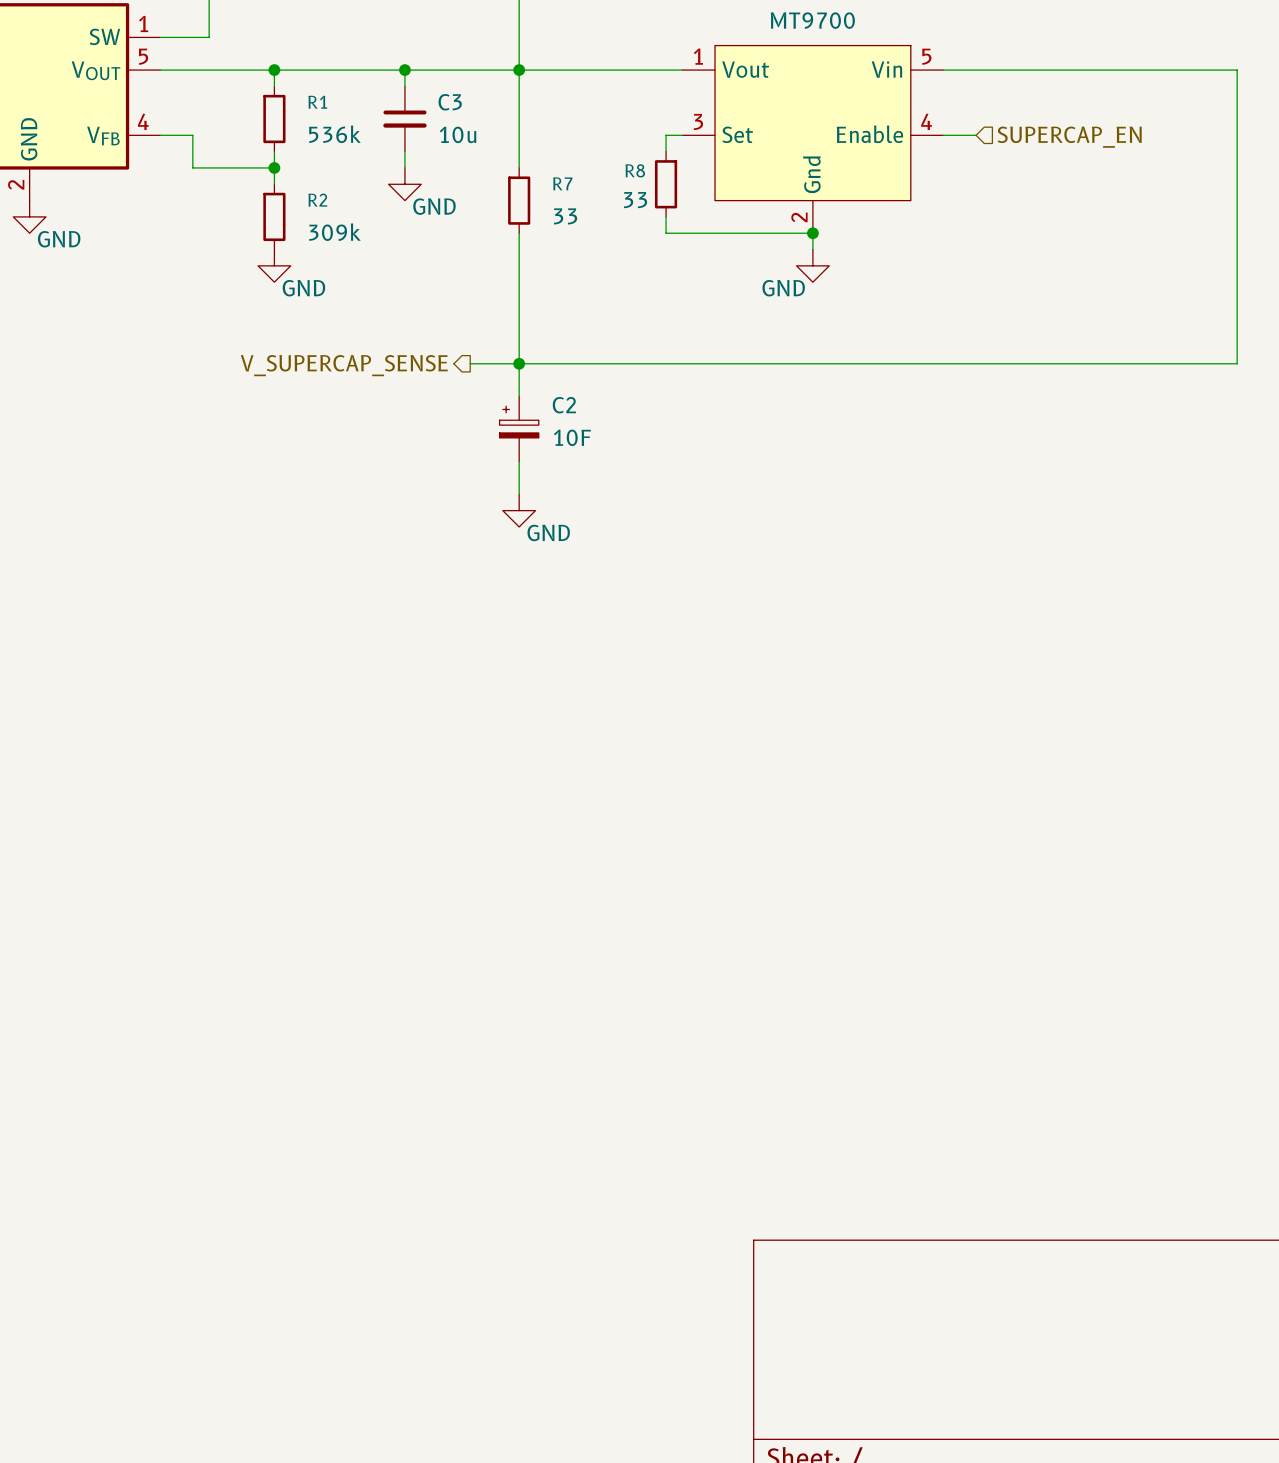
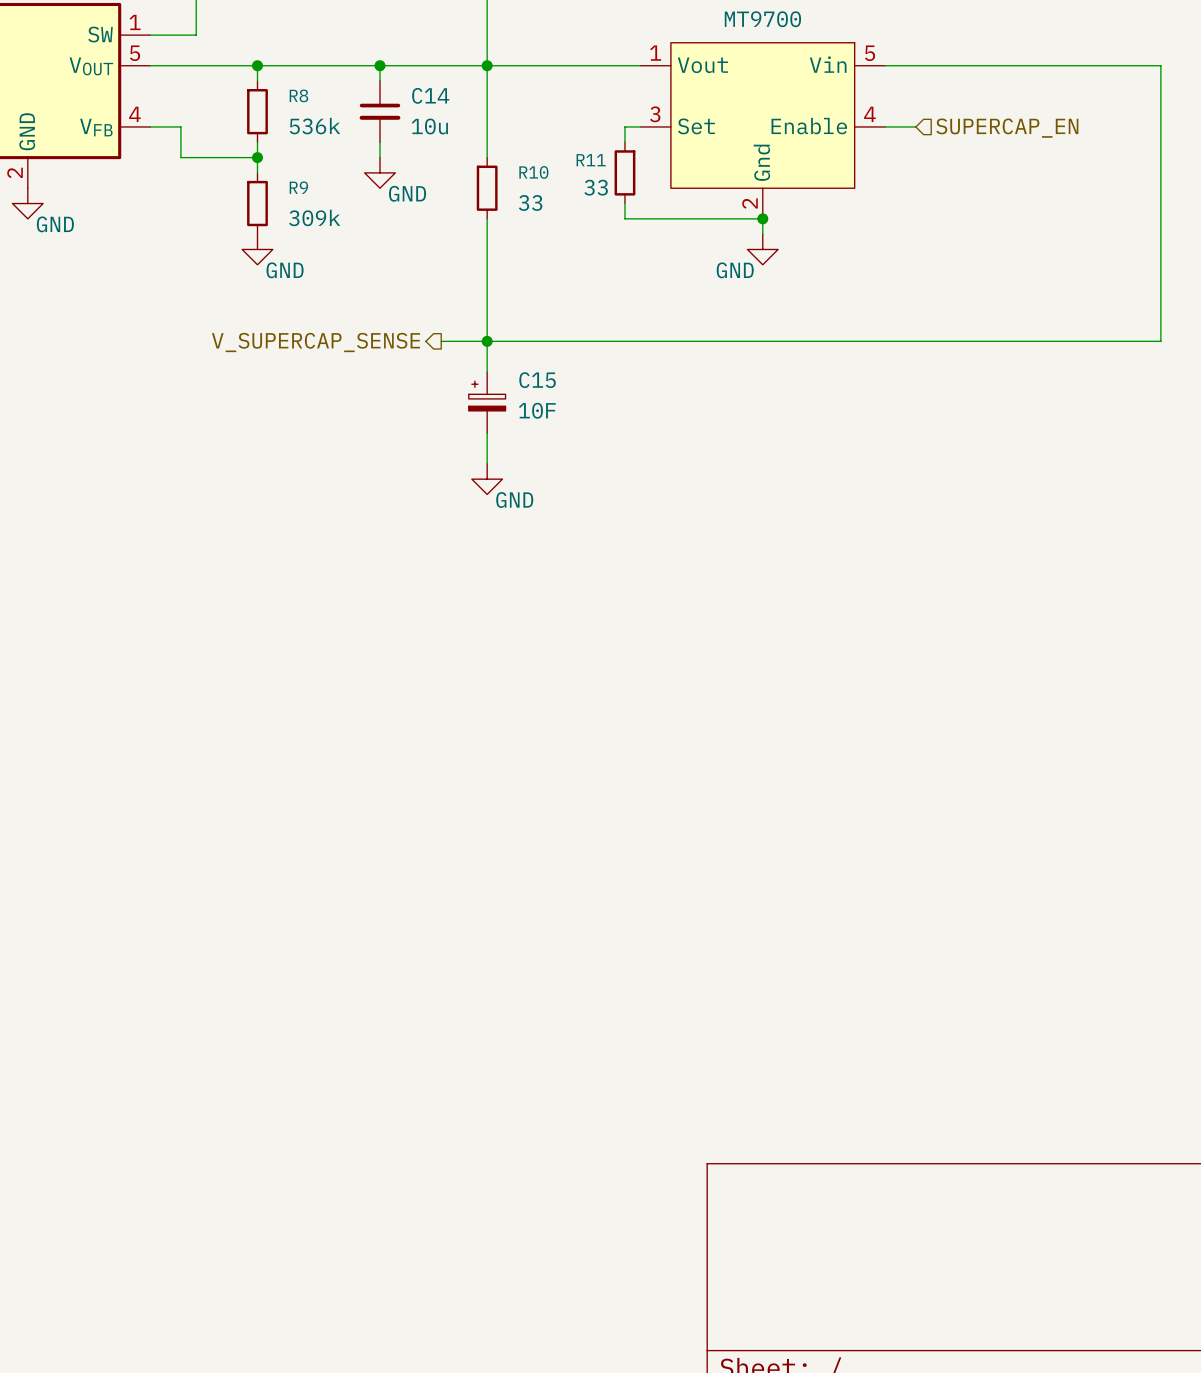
R1 name: R1 (317, 102) -> R8 (298, 95)
C3 name: C3 (450, 102) -> C14 (430, 95)
R8 name: R8 (635, 170) -> R11 (591, 160)
R7 name: R7 (562, 183) -> R10 (533, 172)
R2 name: R2 (317, 200) -> R9 (298, 187)
C2 name: C2 (564, 405) -> C15 (537, 380)

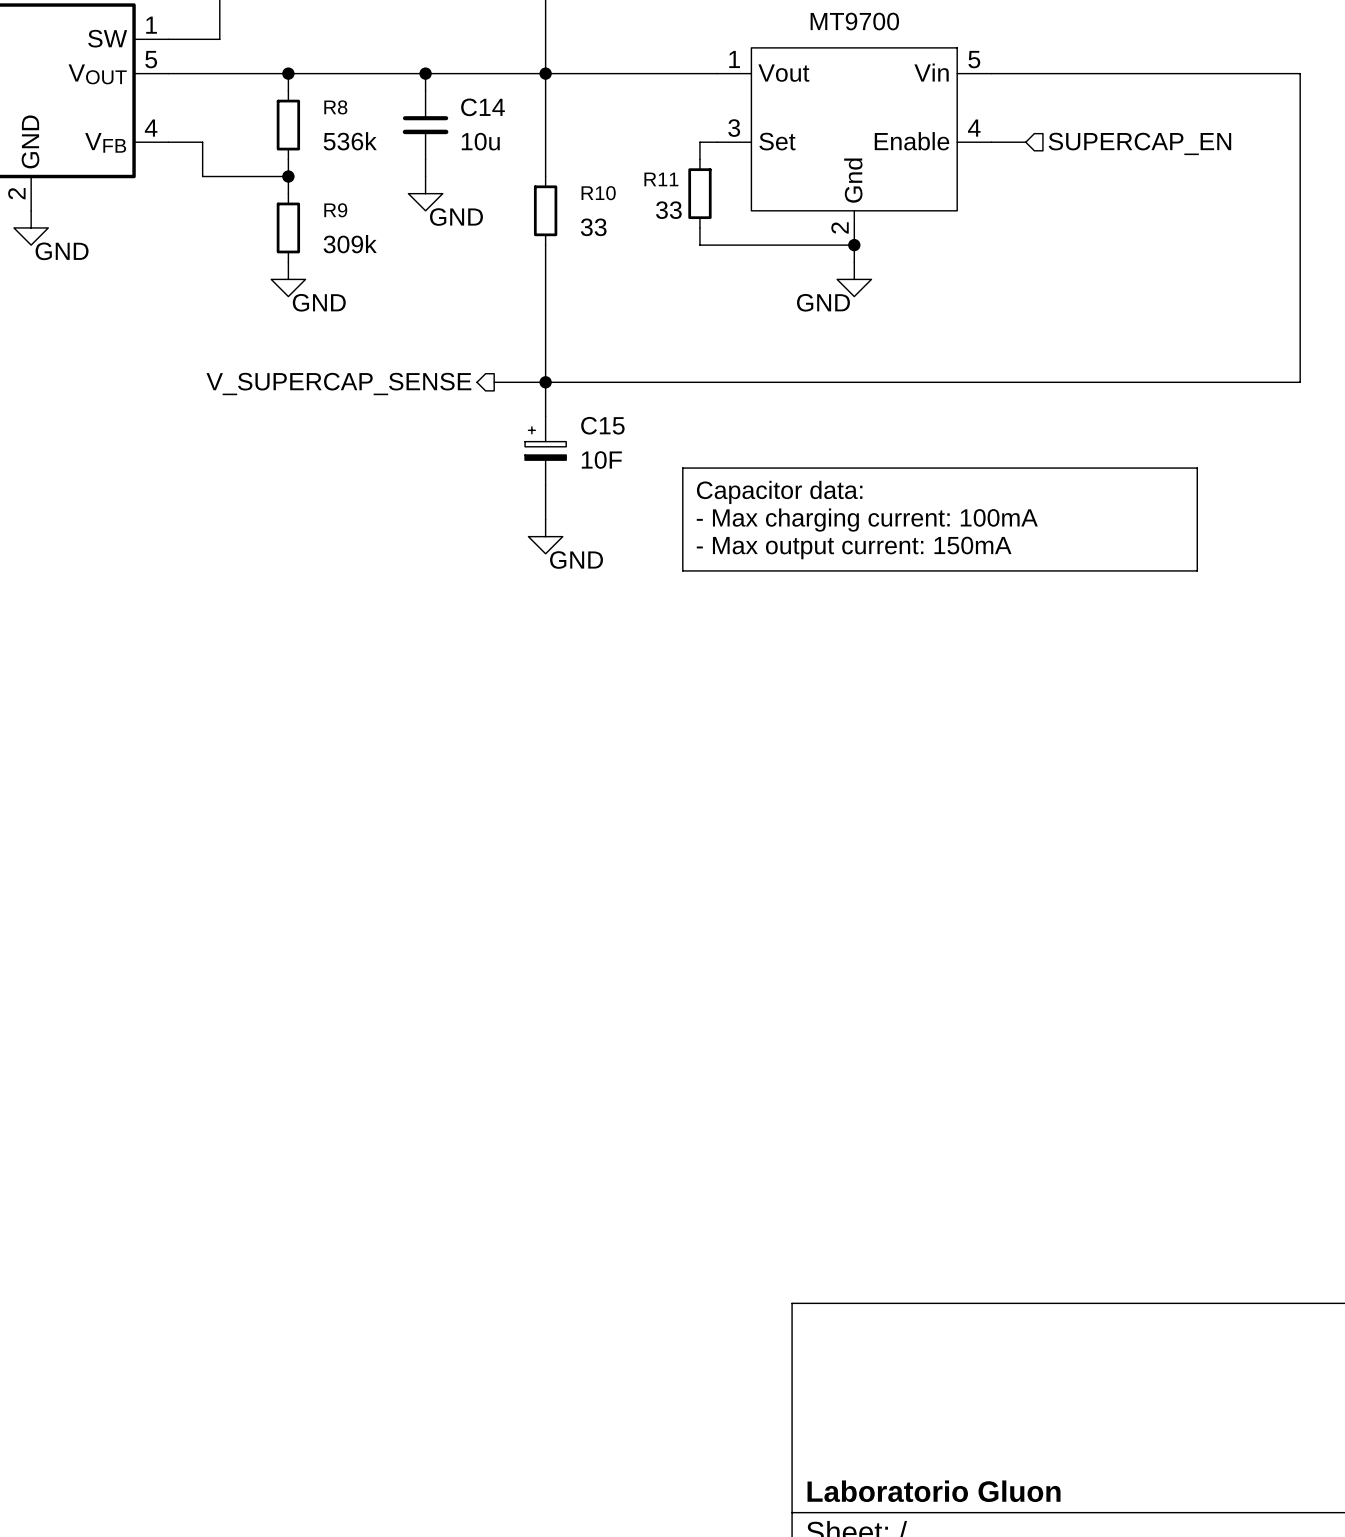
line: none -> (682, 468) (1197, 468) (1197, 570) (682, 570) (682, 468)
text: none -> Capacitor data: (779, 492)
text: none -> - Max charging current: 100mA (867, 520)
text: none -> - Max output current: 150mA (854, 547)
title block: none -> Laboratorio Gluon (934, 1491)

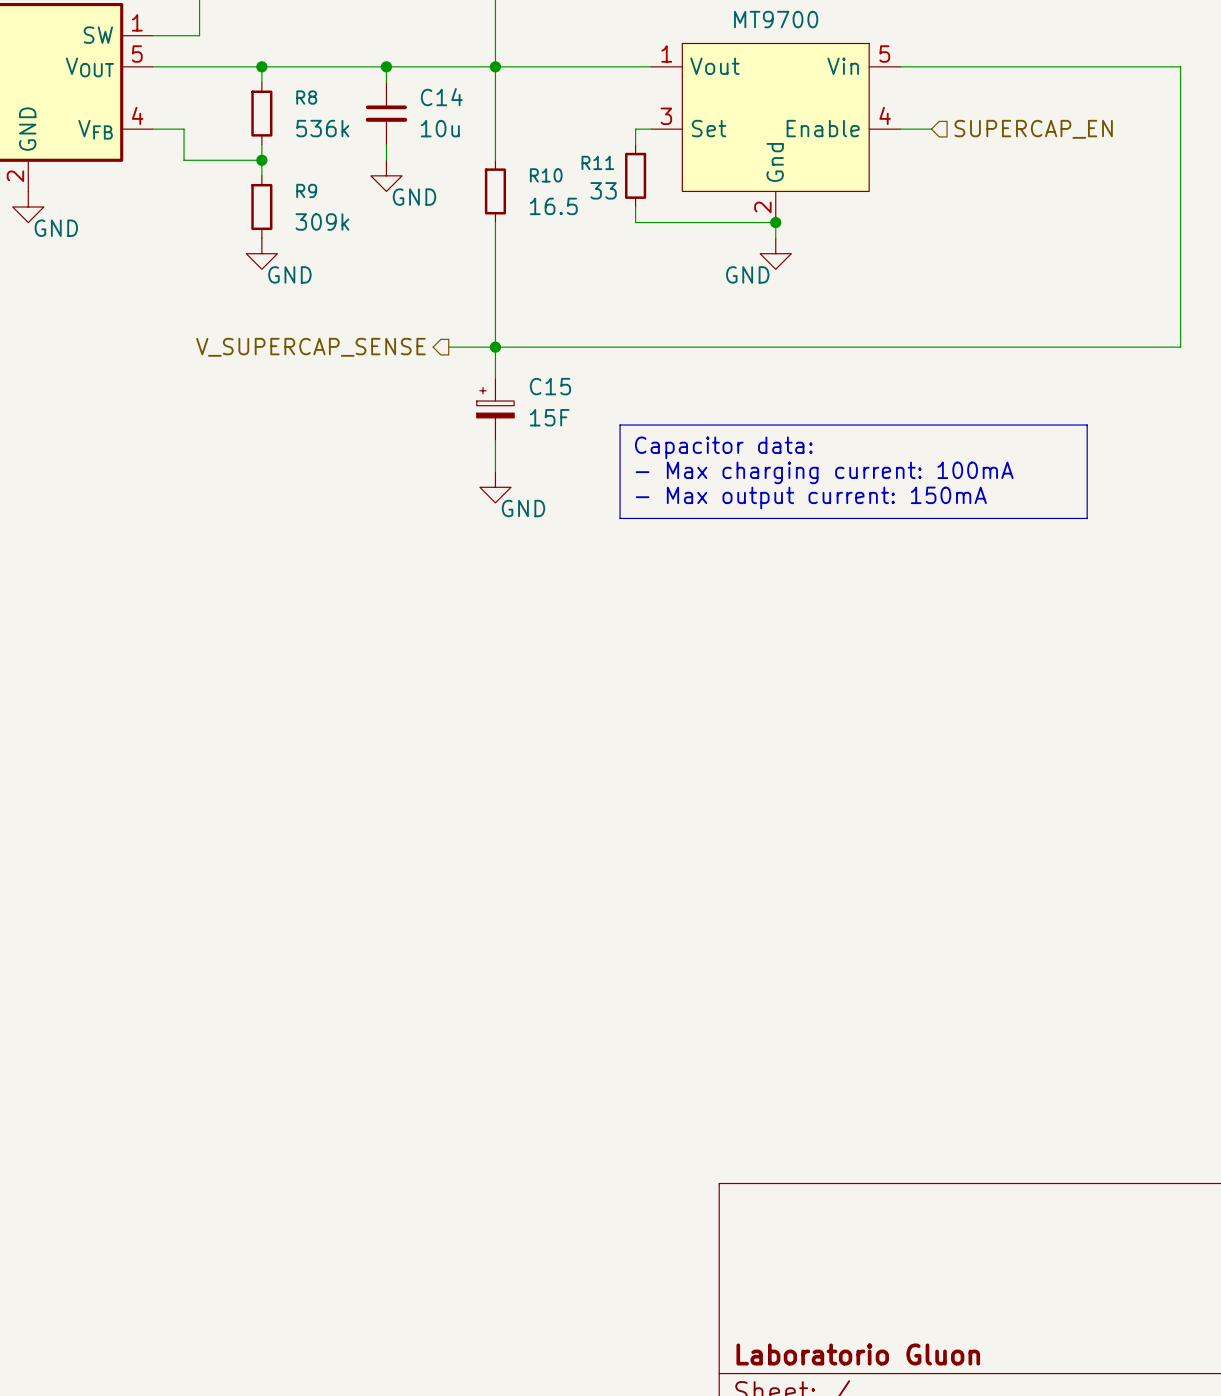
R10 value: 33 (593, 227) -> 16.5 (553, 206)
C15 value: 10F (601, 460) -> 15F (549, 417)

